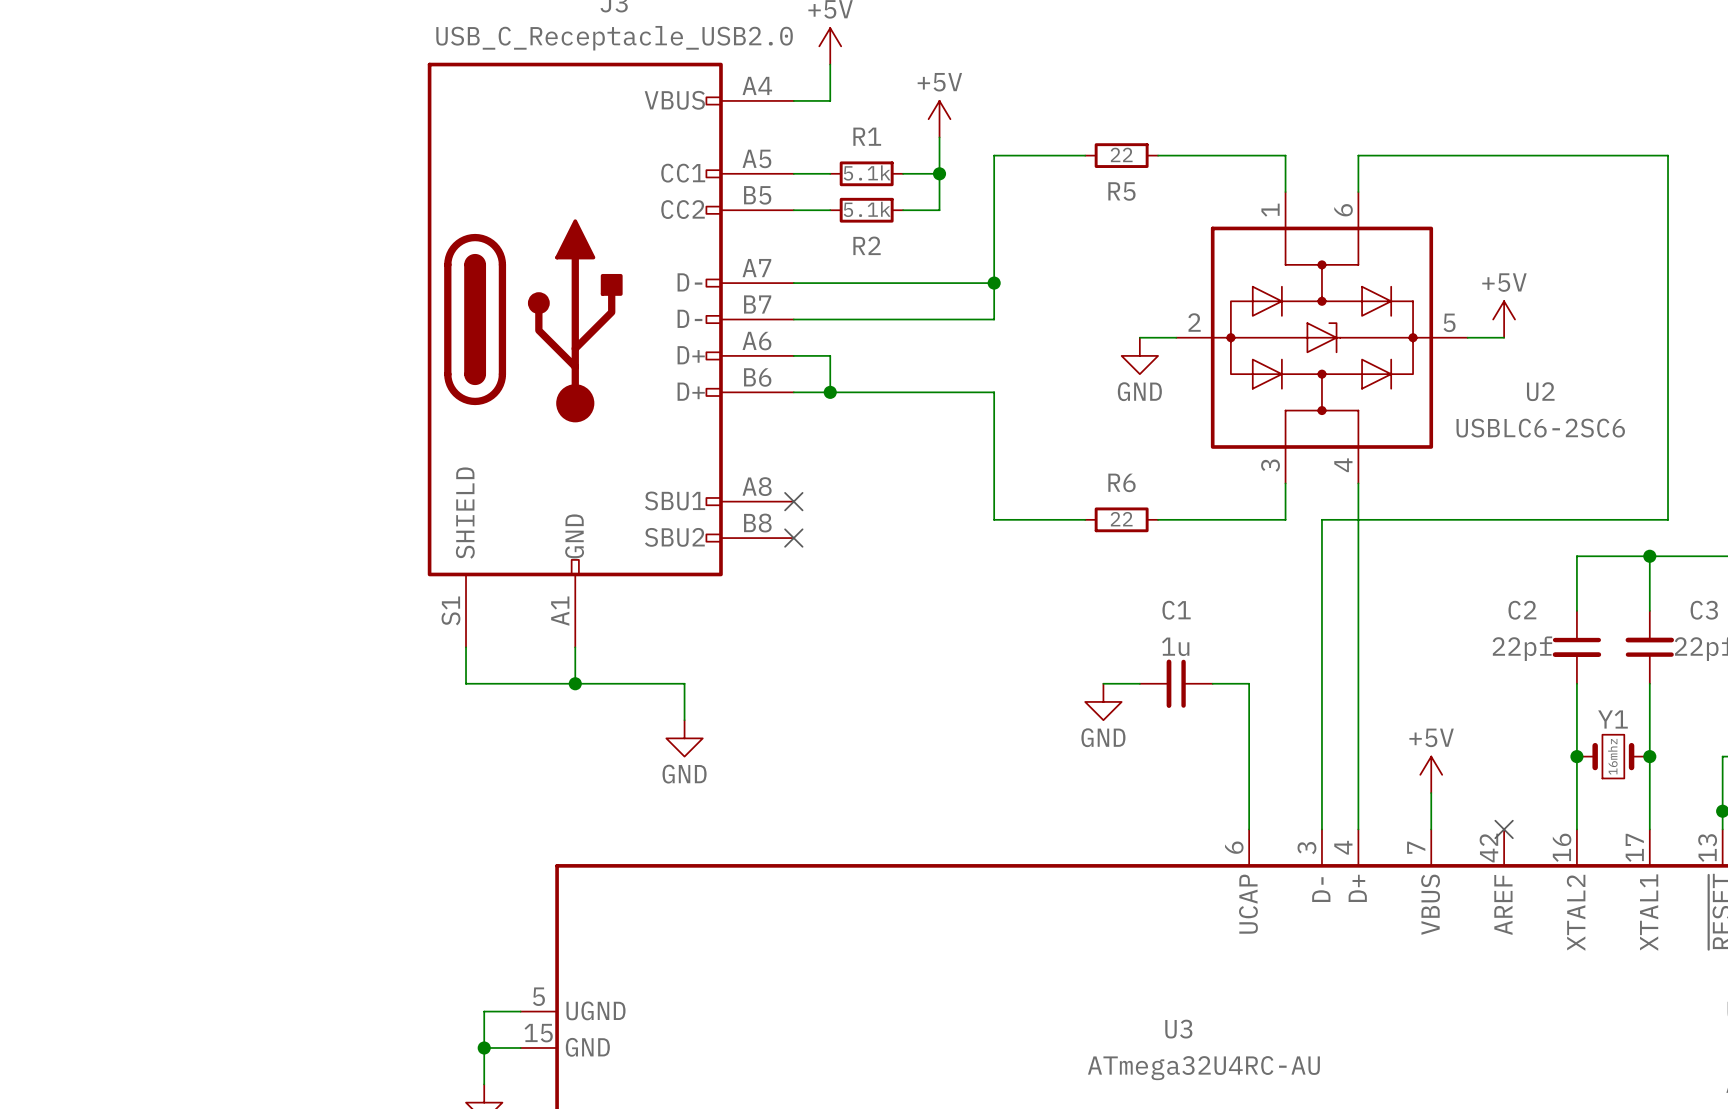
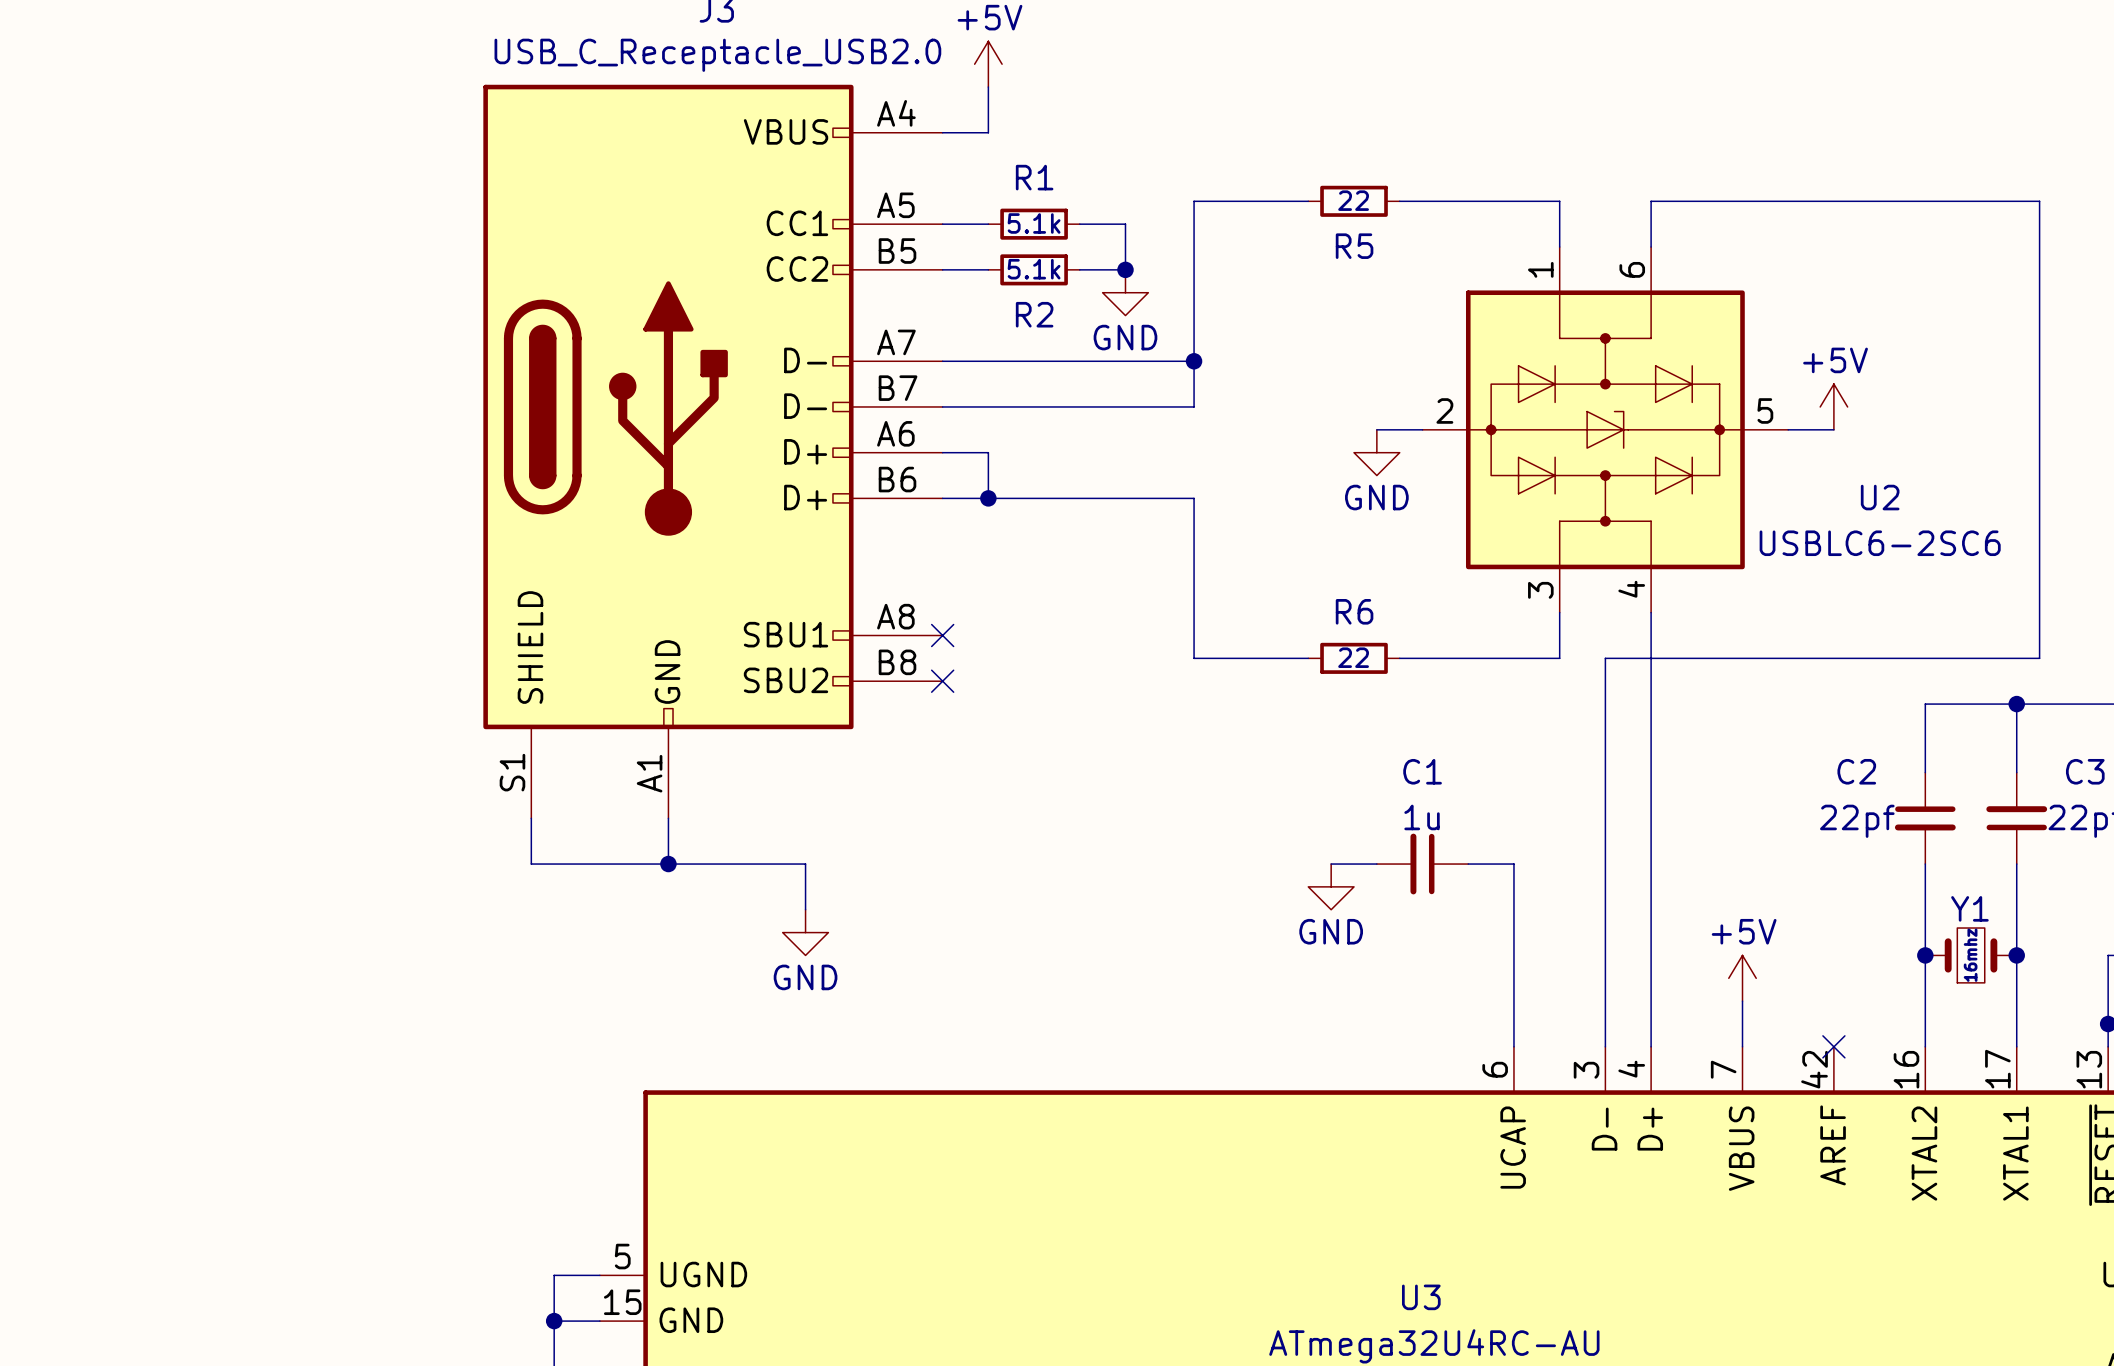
power symbol: +5V (939, 119) -> none
wire: (939, 137) (939, 173) -> none
junction position: (939, 173) -> (1125, 269)
power symbol: none -> GND (1125, 292)

